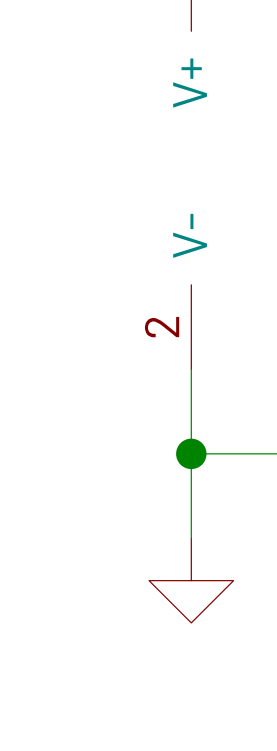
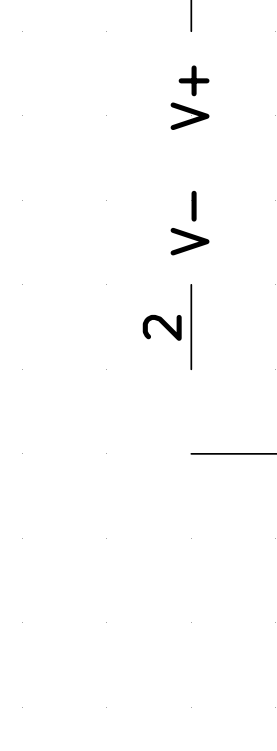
wire: (191, 369) (191, 538) -> none
junction: (191, 453) -> none
power symbol: (191, 580) -> none

